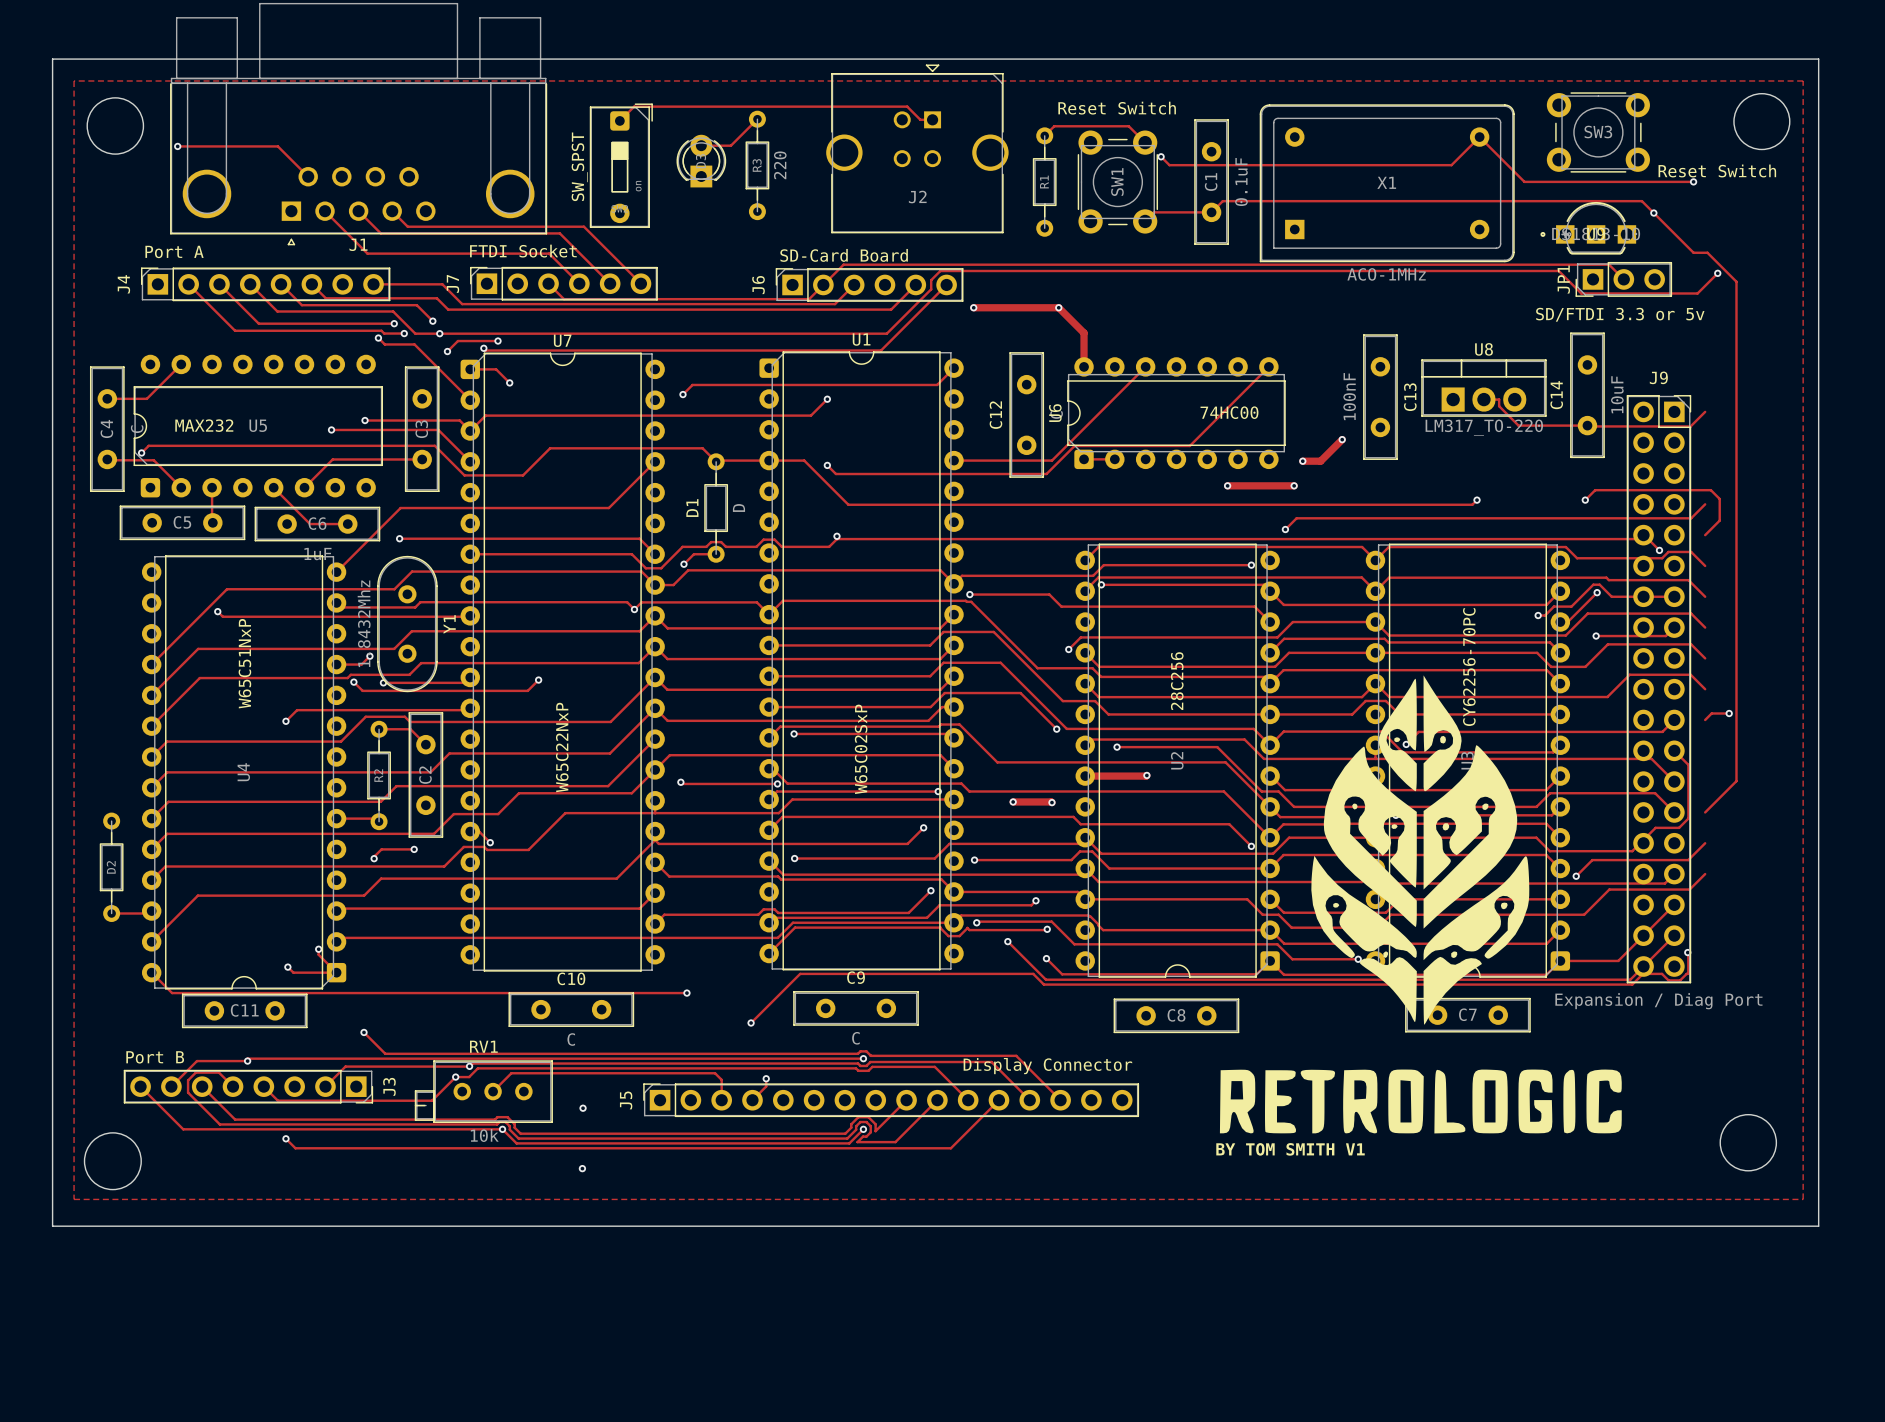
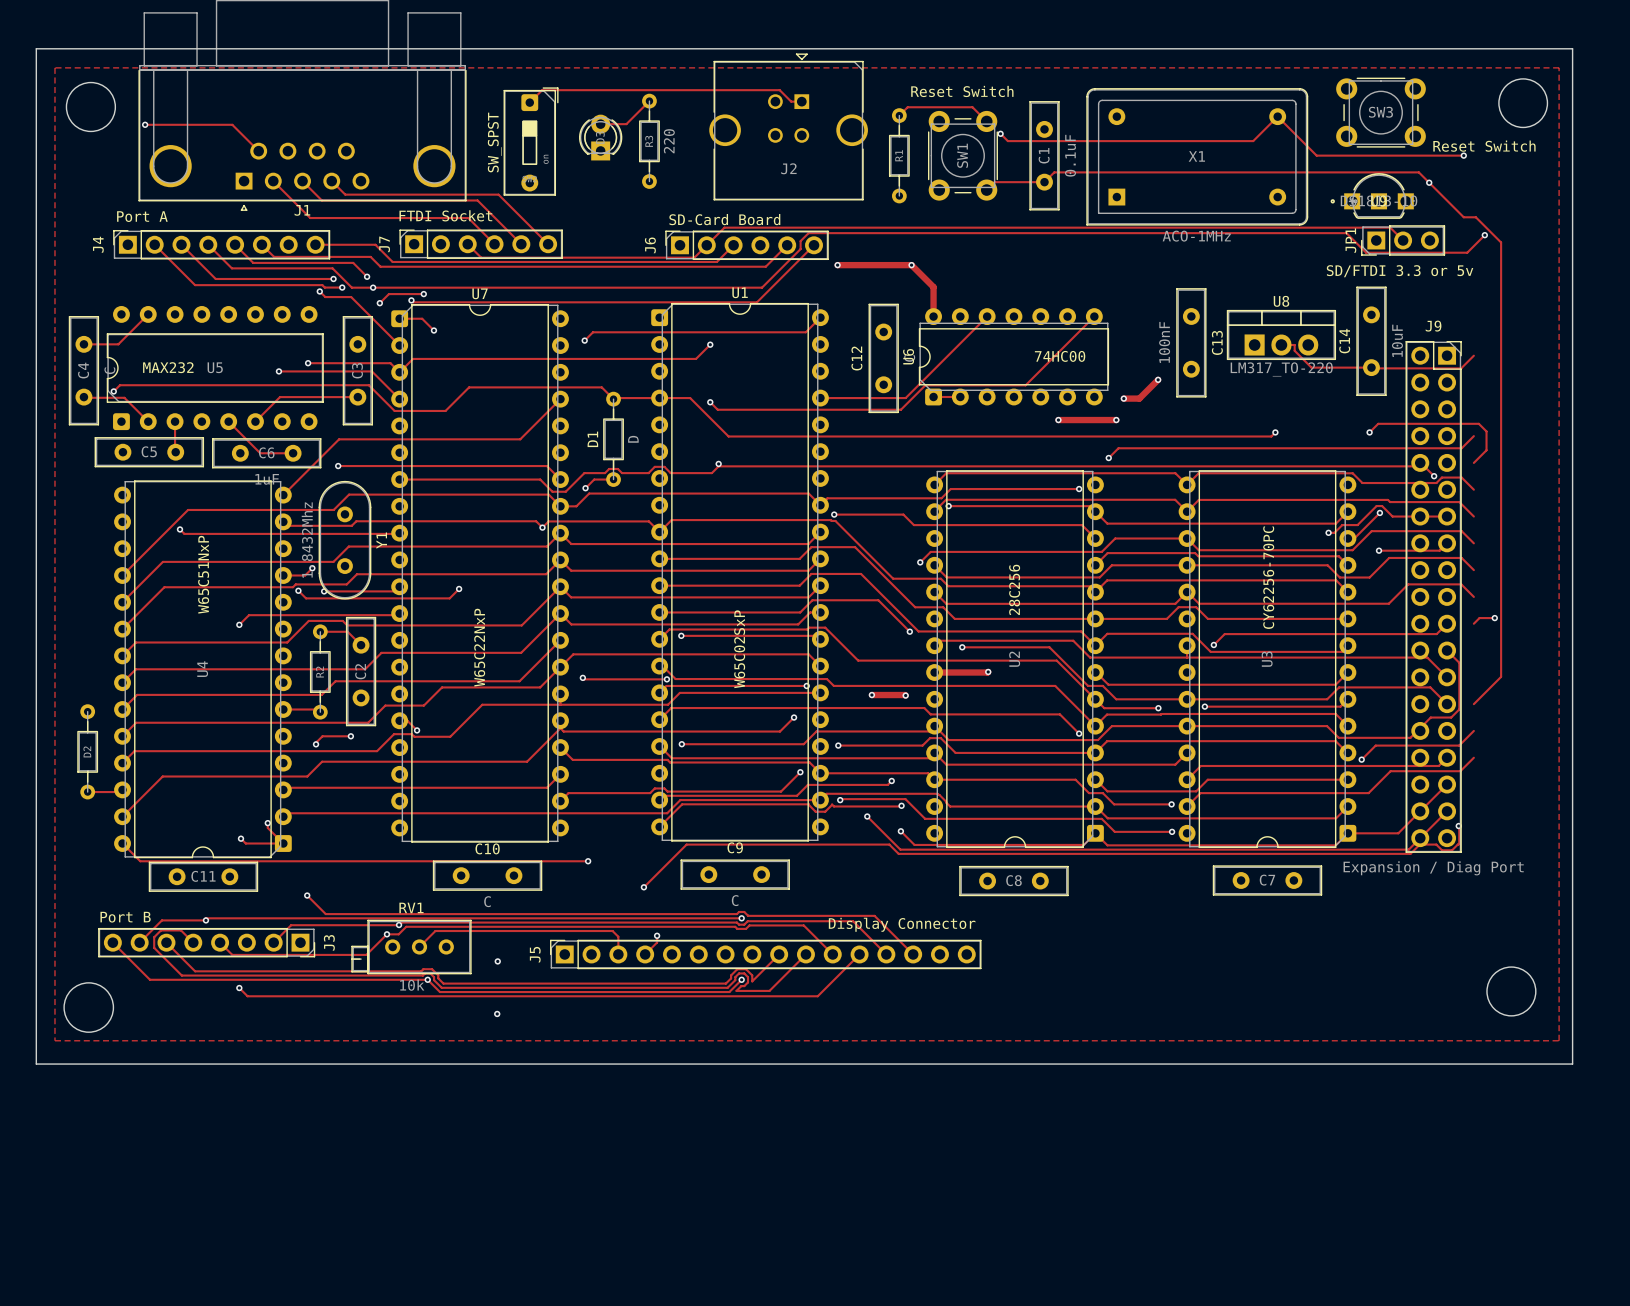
drawing: [1219, 675, 1622, 1134] -> none
text: BY TOM SMITH V1 (1290, 1149) -> none

